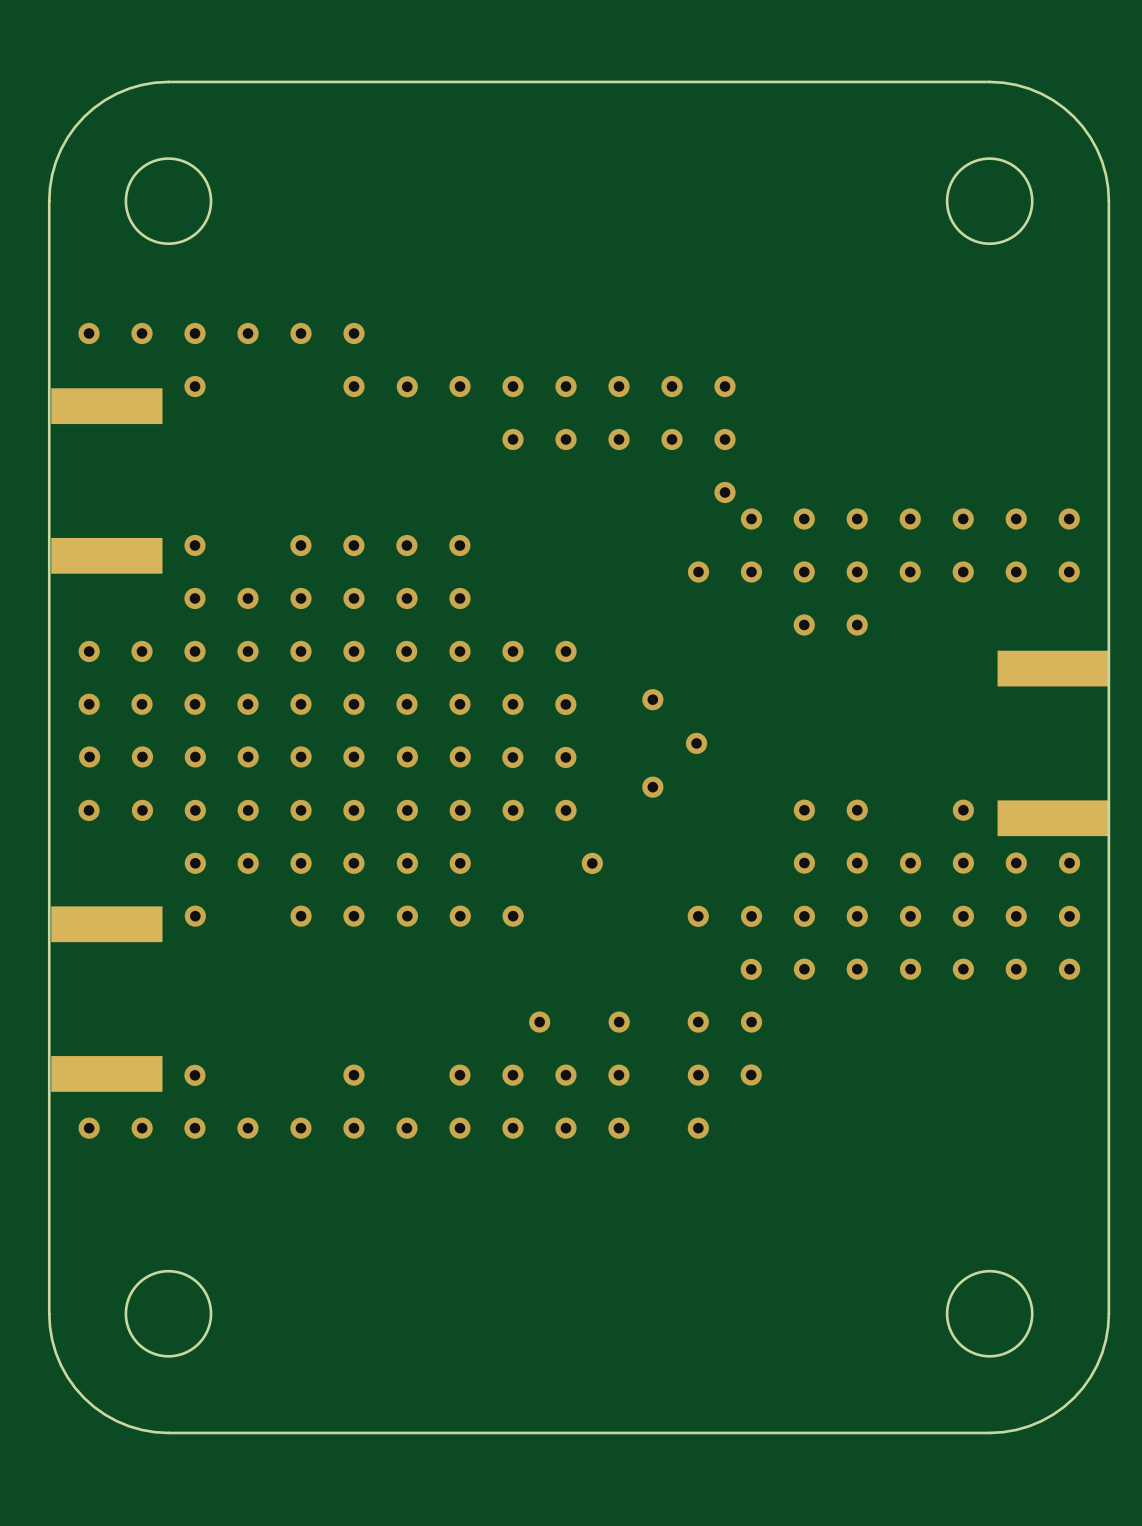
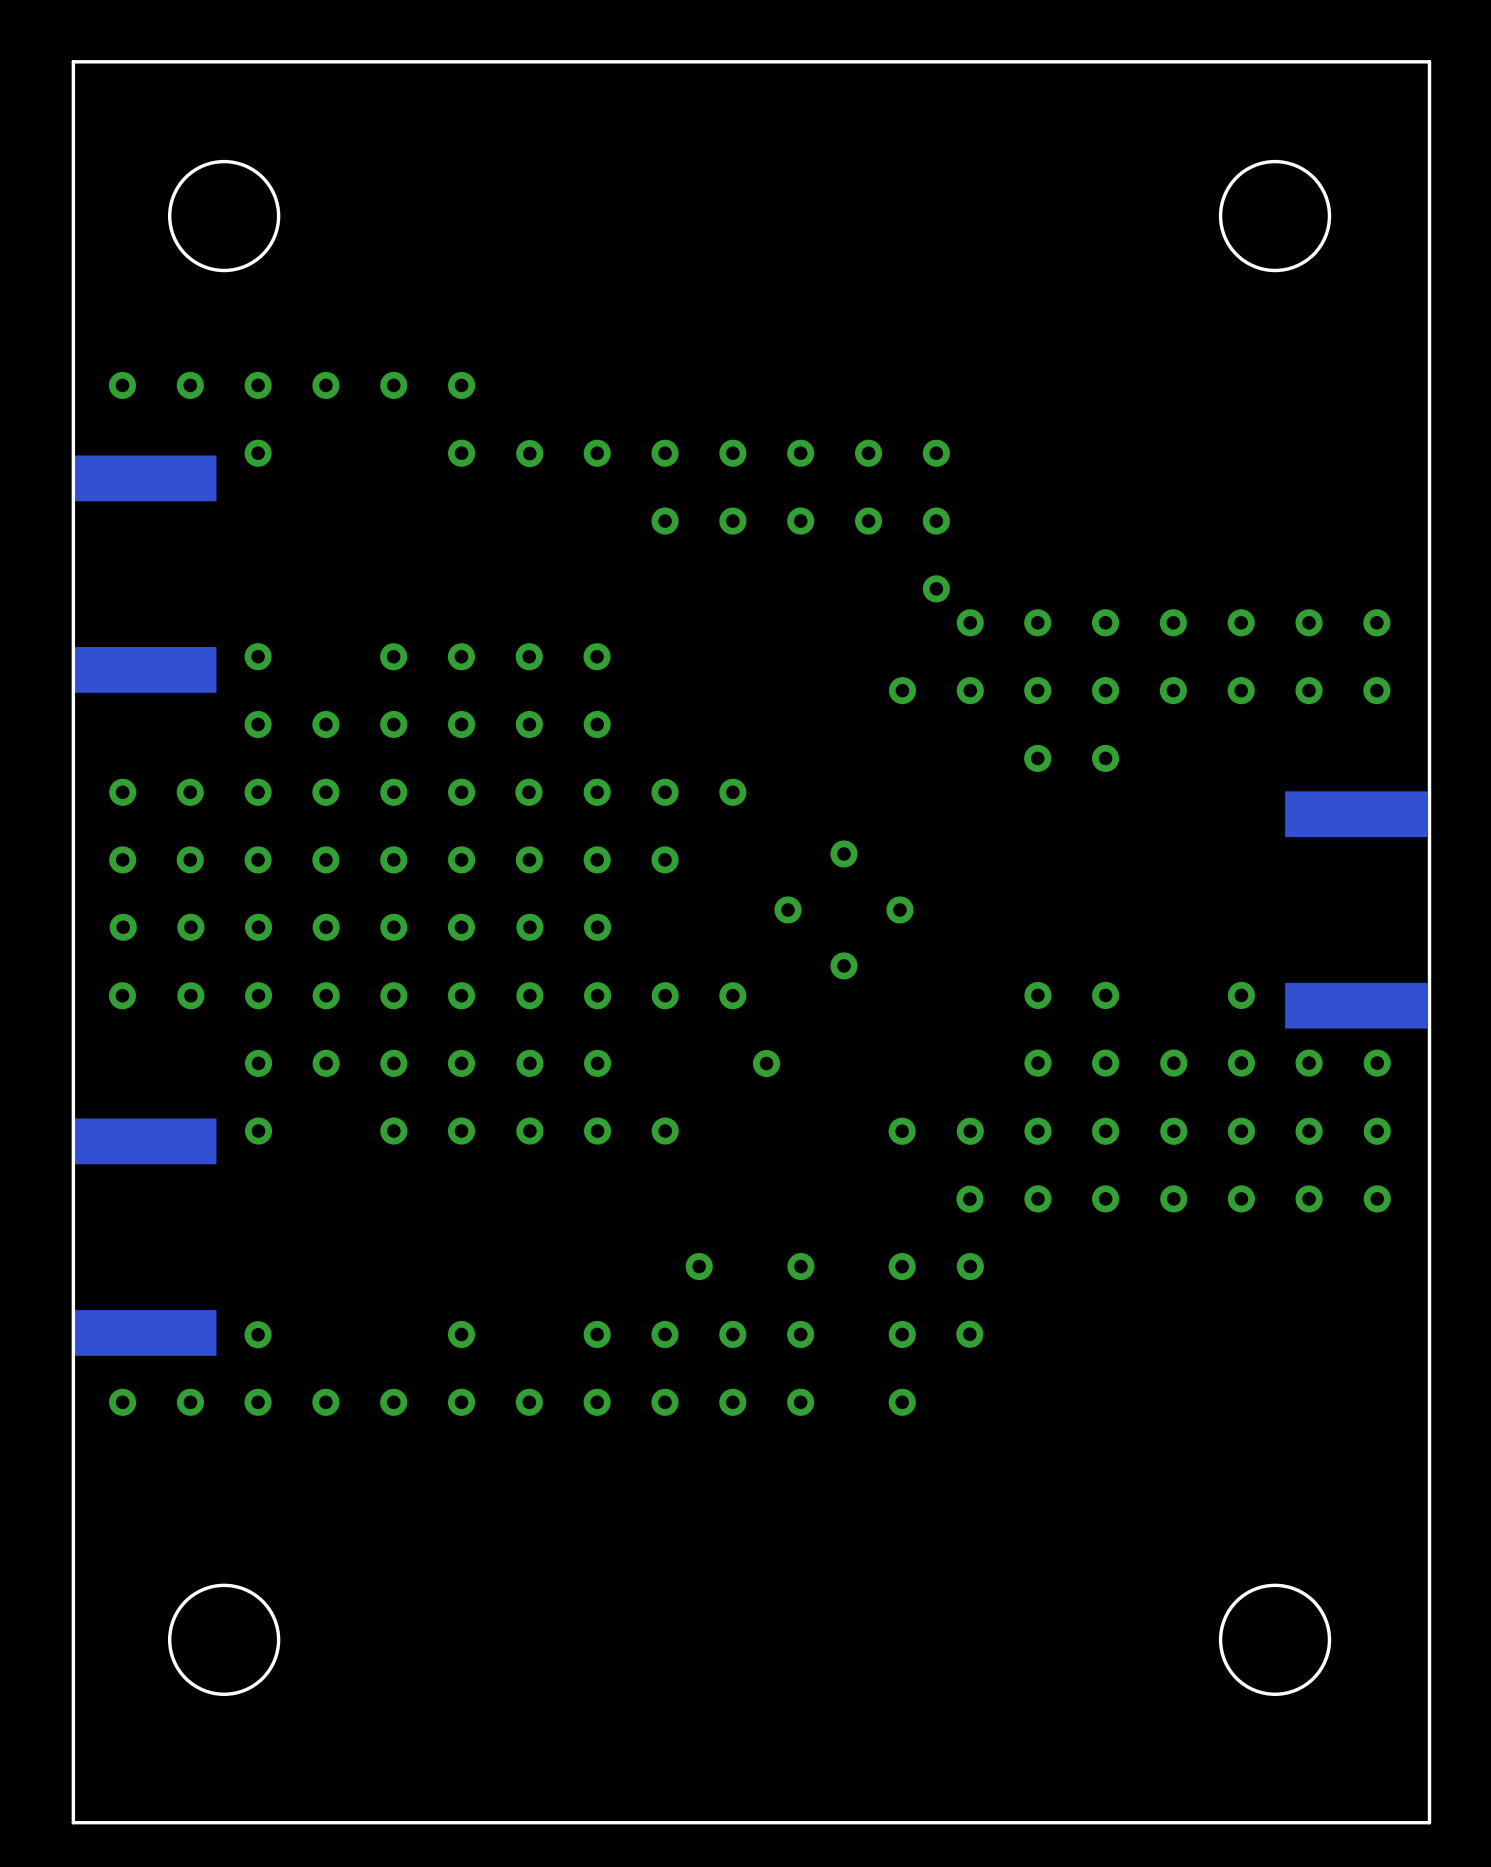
board edge: (989, 81) (155, 82) (129, 88) (105, 100) (84, 116) (67, 137) (52, 174) (49, 201) (49, 1313) (52, 1340) (61, 1365) (84, 1398) (105, 1414) (129, 1426) (168, 1432) (989, 1432) (1016, 1429) (1041, 1421) (1073, 1398) (1090, 1377) (1105, 1340) (1108, 1313) (1108, 187) (1097, 149) (1073, 116) (1041, 93) (1016, 84) (989, 81) -> (1429, 61) (1429, 1822) (73, 1822) (73, 61) (1429, 61)
via: (565, 704) -> none
via: none -> (788, 909)
via: (512, 757) -> none
via: (565, 757) -> none

